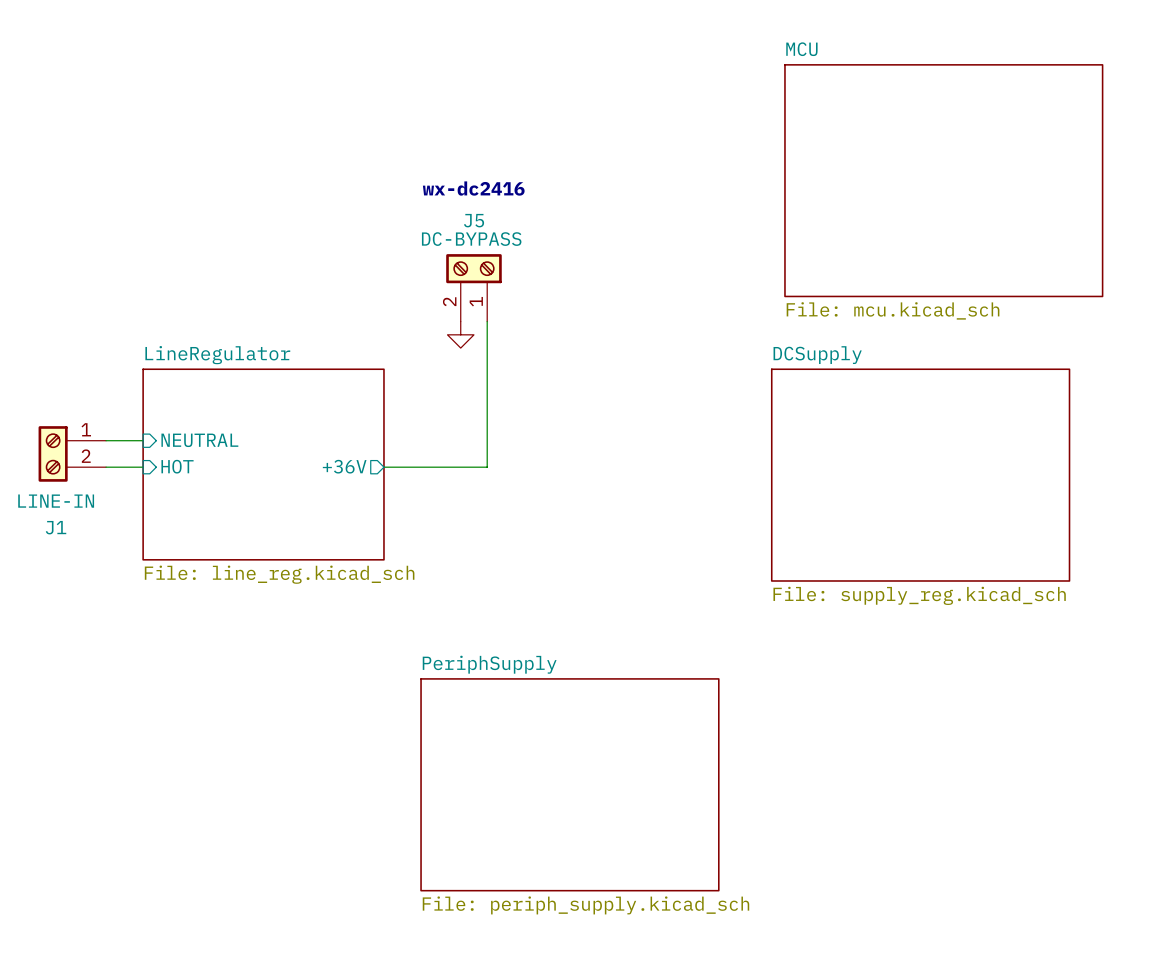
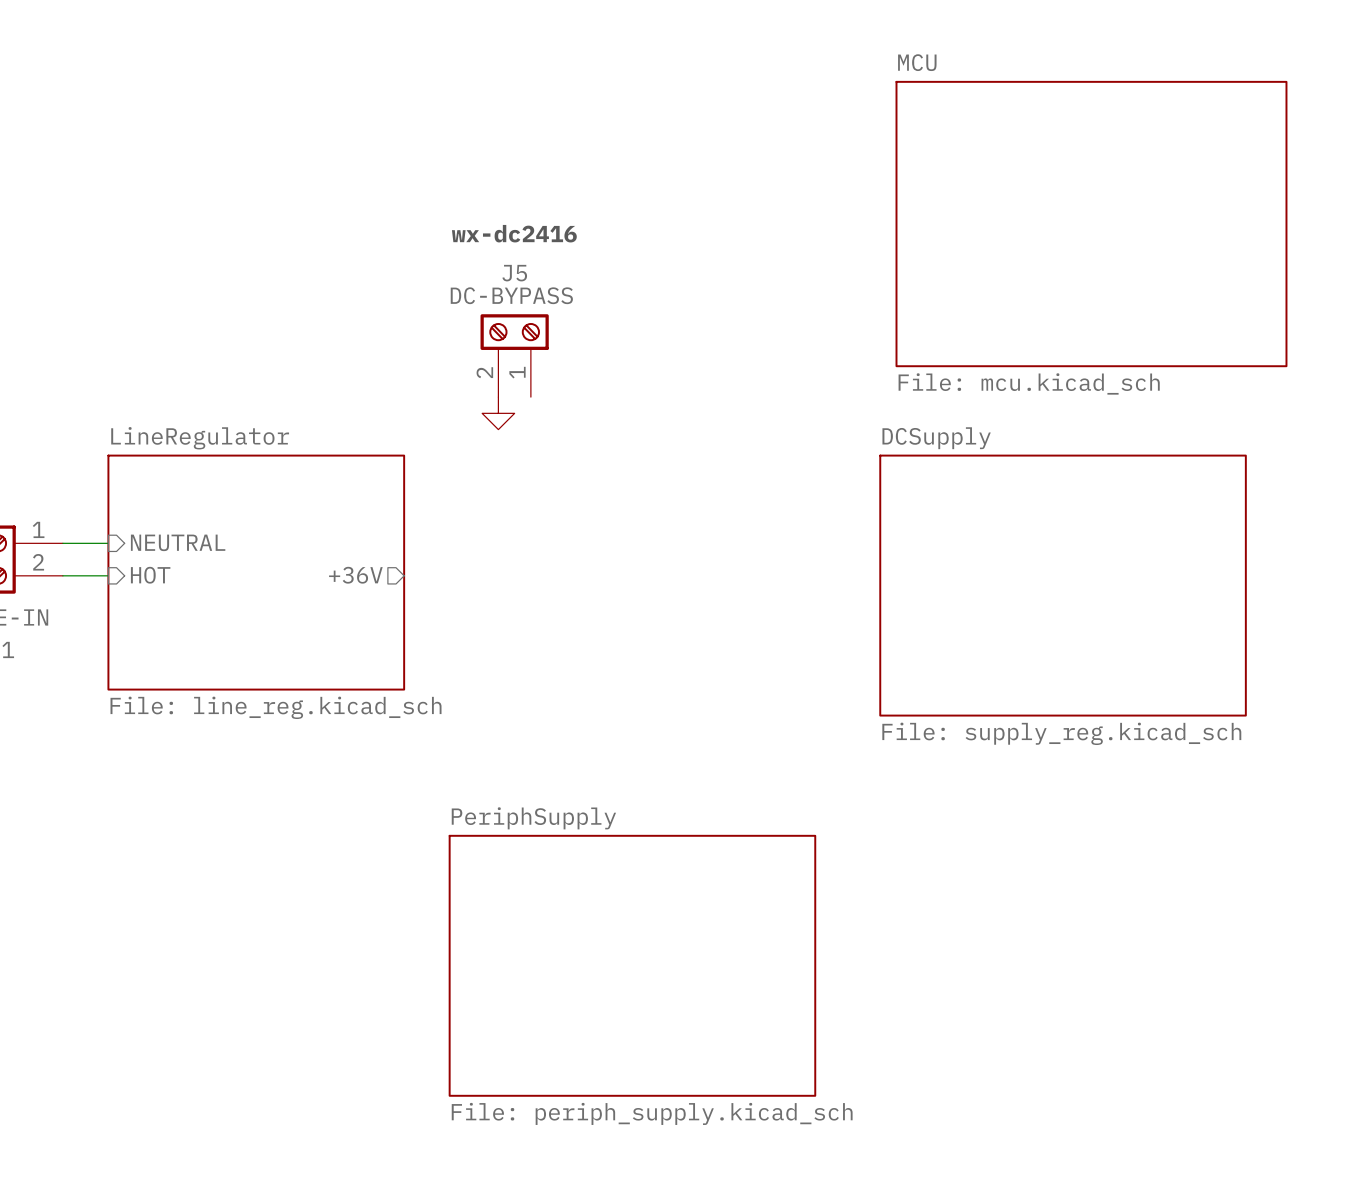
wire: (487, 321) (487, 467) (383, 467) -> none

